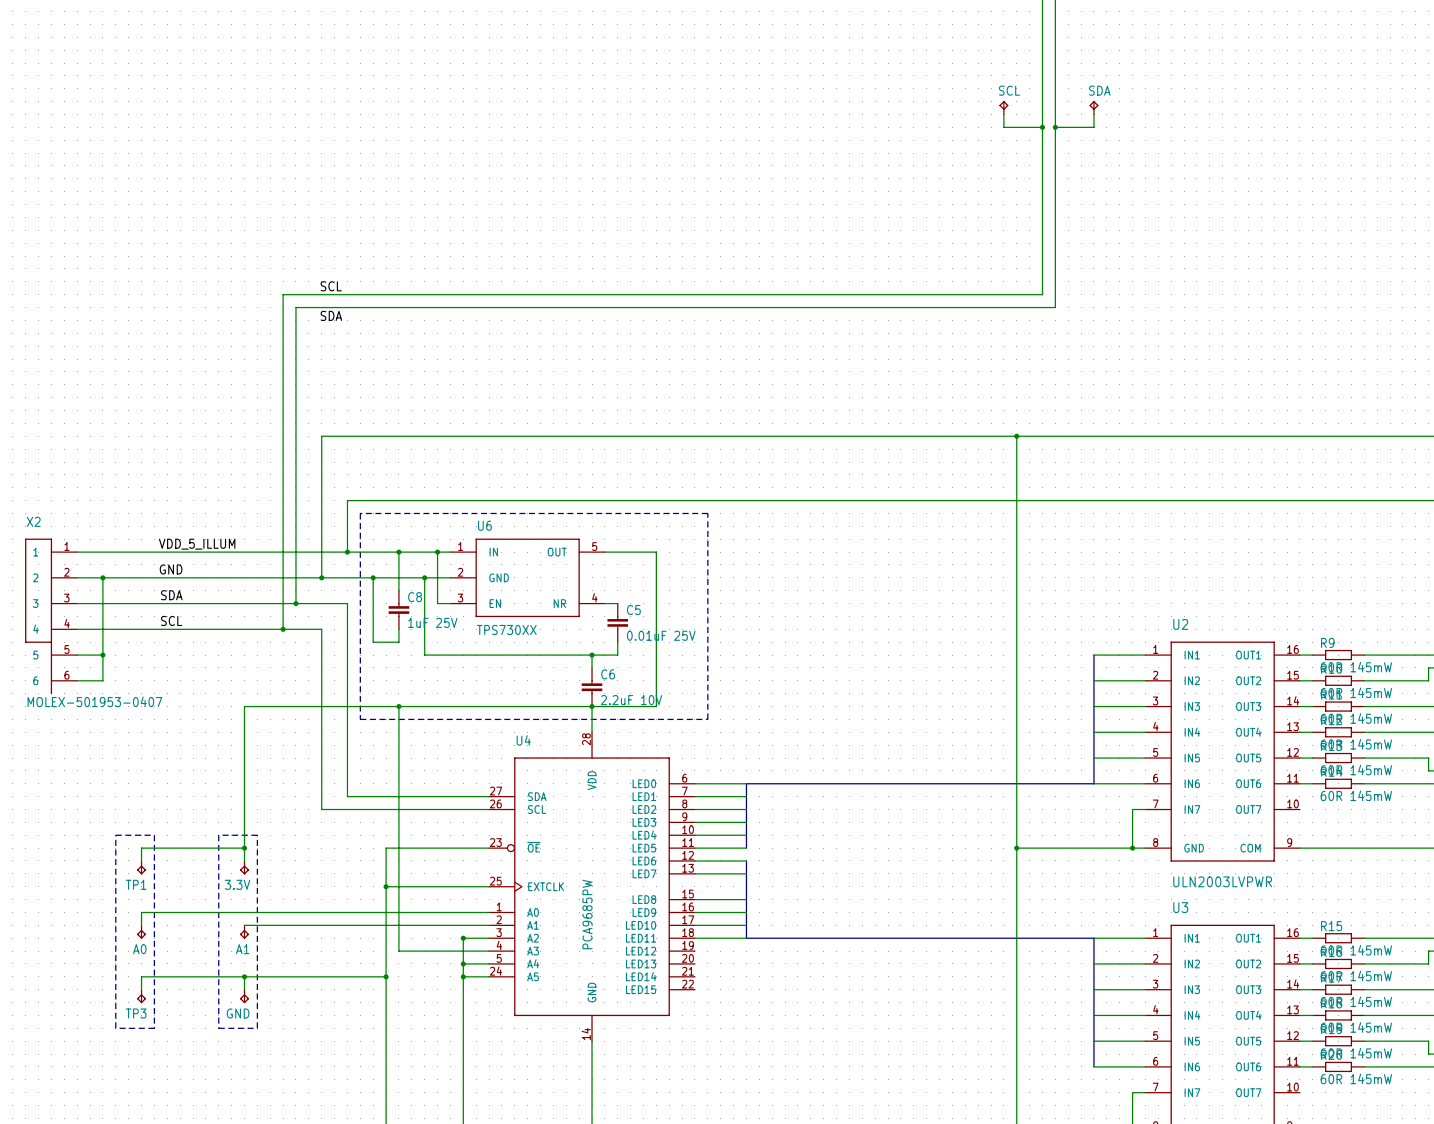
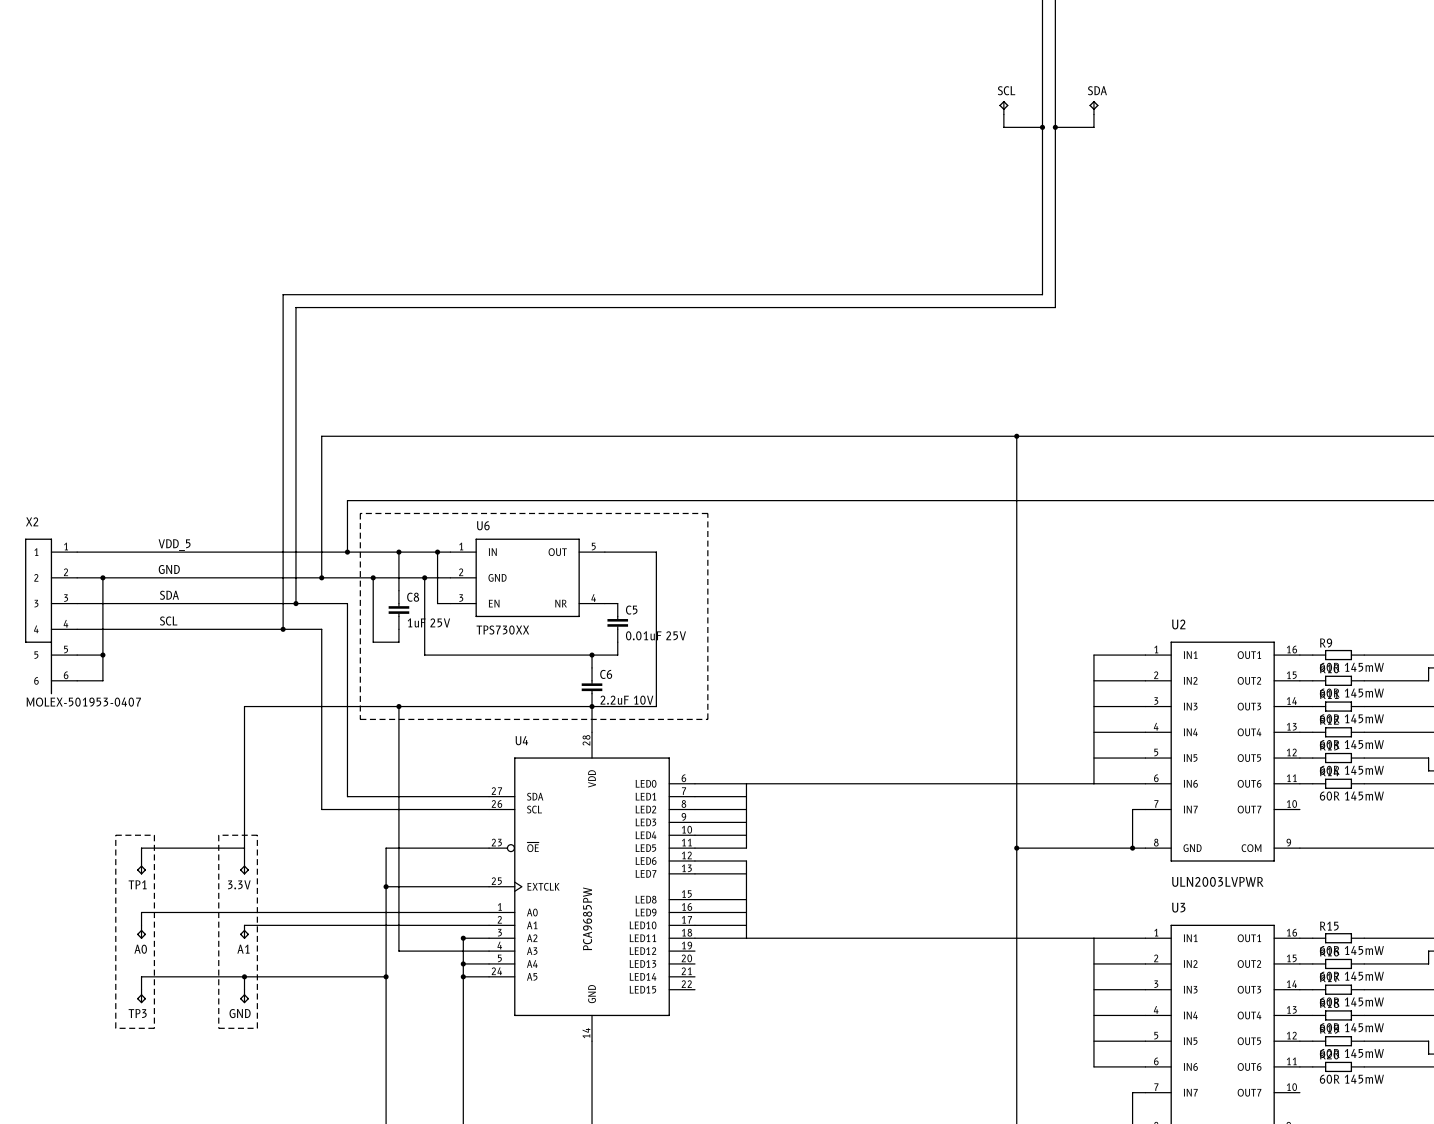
label: SCL (331, 286) -> none
label: SDA (331, 315) -> none
label: VDD_5_ILLUM (197, 544) -> VDD_5 (174, 545)
junction: (244, 848) -> none

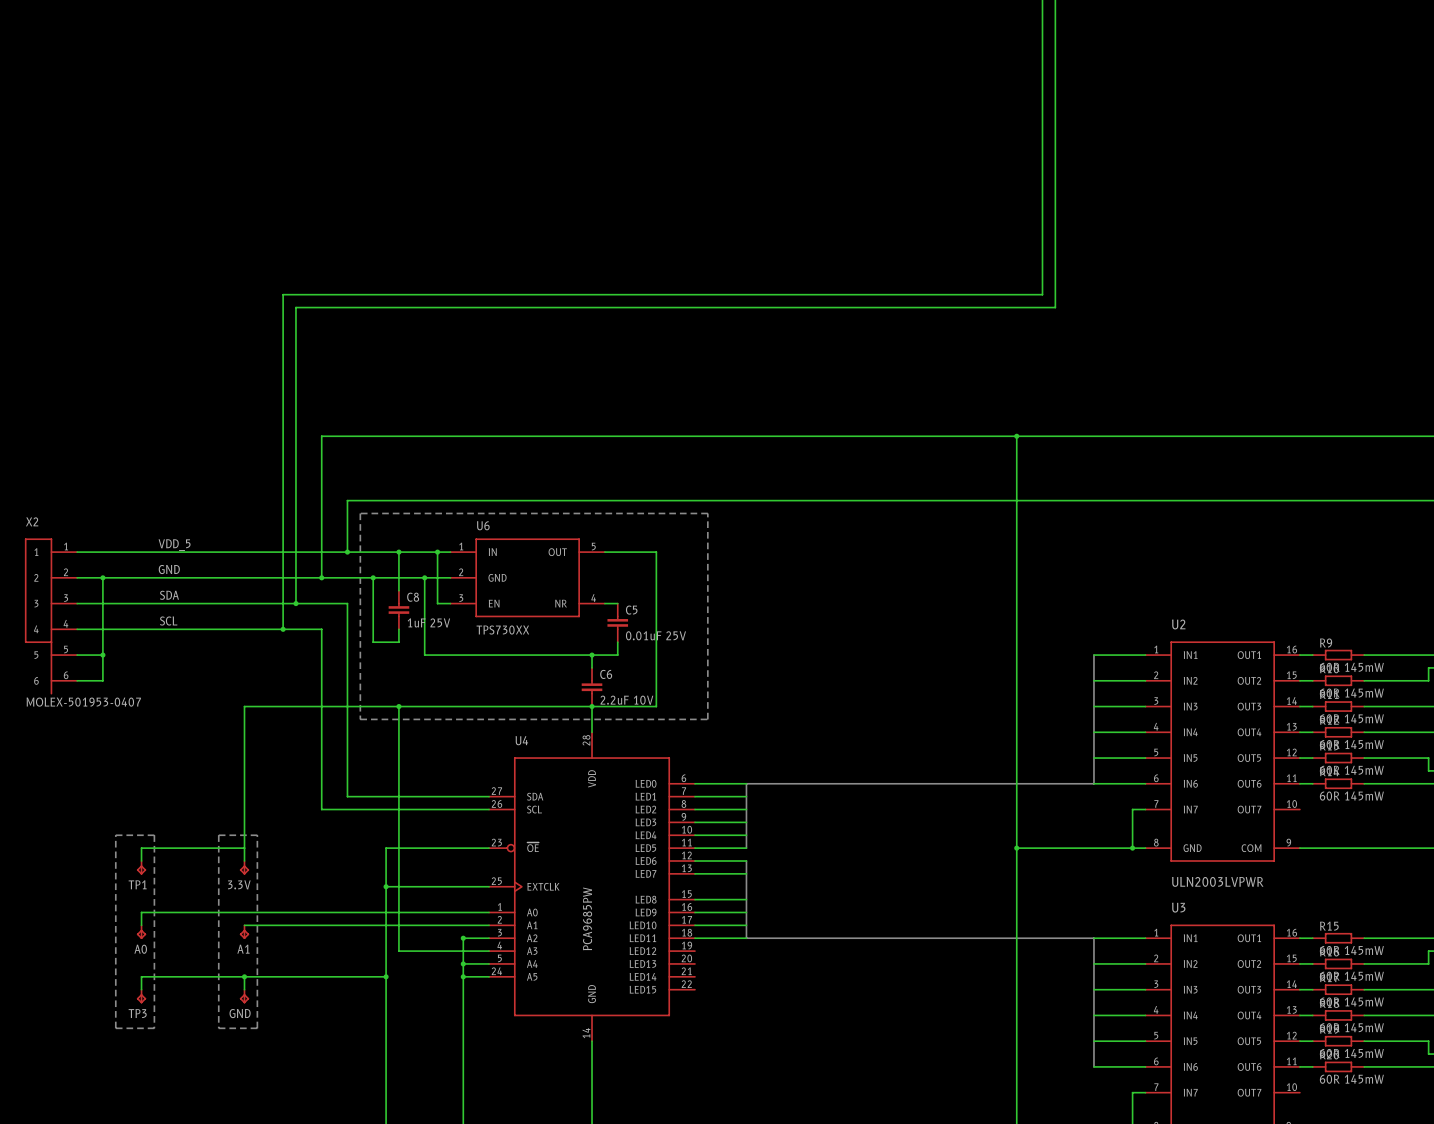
SCL: (1003, 107) -> none
SDA: (1093, 107) -> none
wire: (1003, 114) (1003, 127) (1042, 127) -> none
wire: (1093, 114) (1093, 127) (1055, 127) -> none
junction: (1042, 127) -> none
junction: (1055, 127) -> none

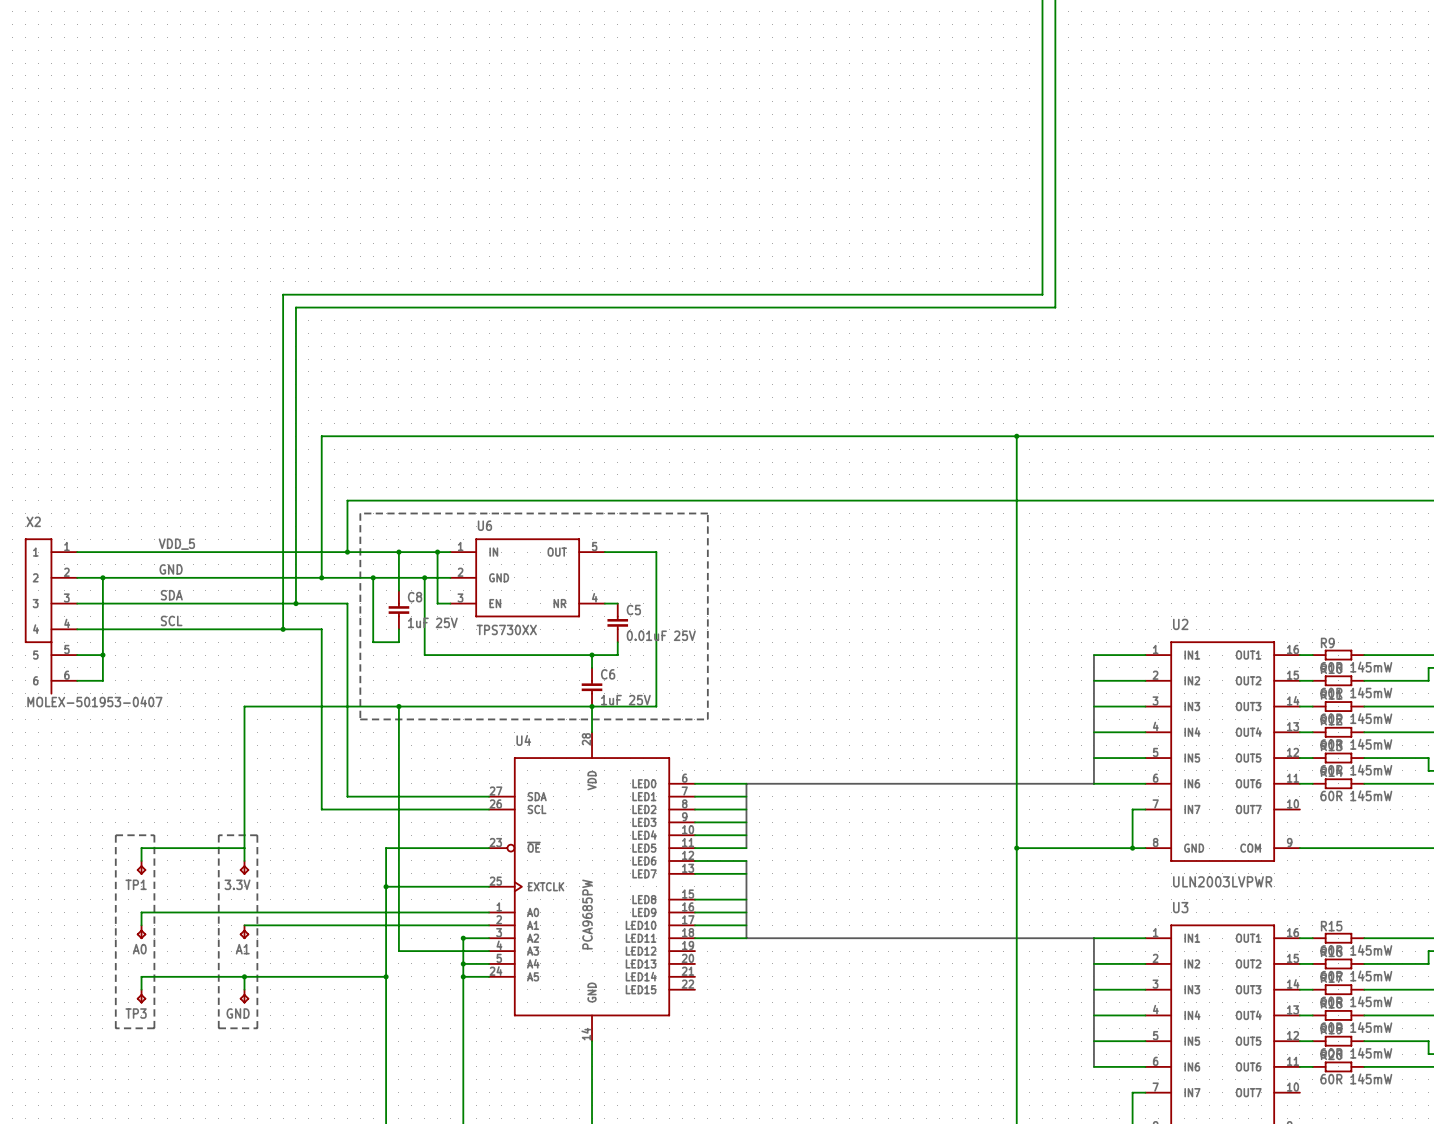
C6 value: 2.2uF 10V (626, 700) -> 1uF 25V (625, 700)

